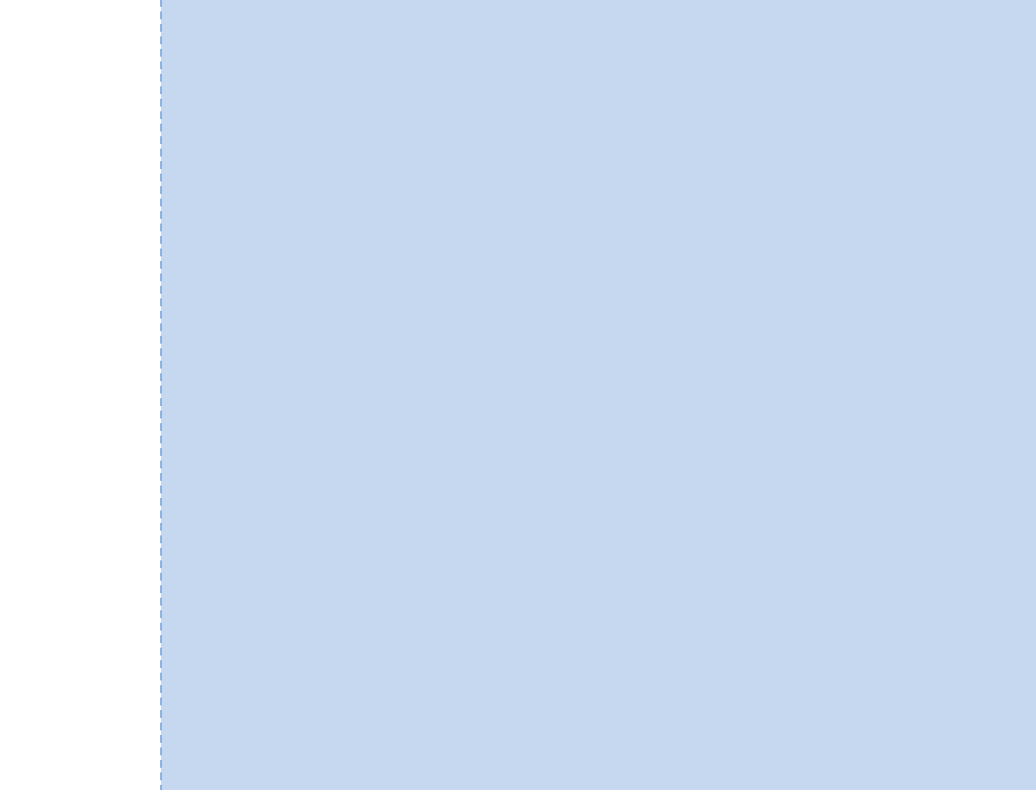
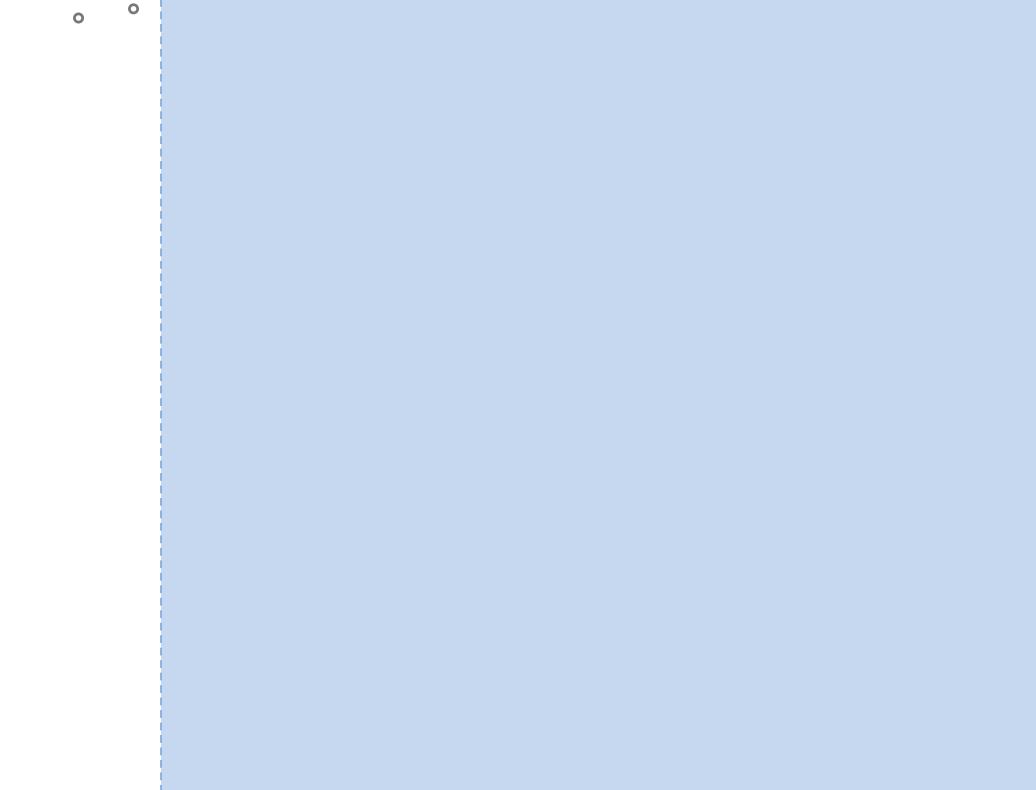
via: none -> (133, 8)
via: none -> (78, 18)

